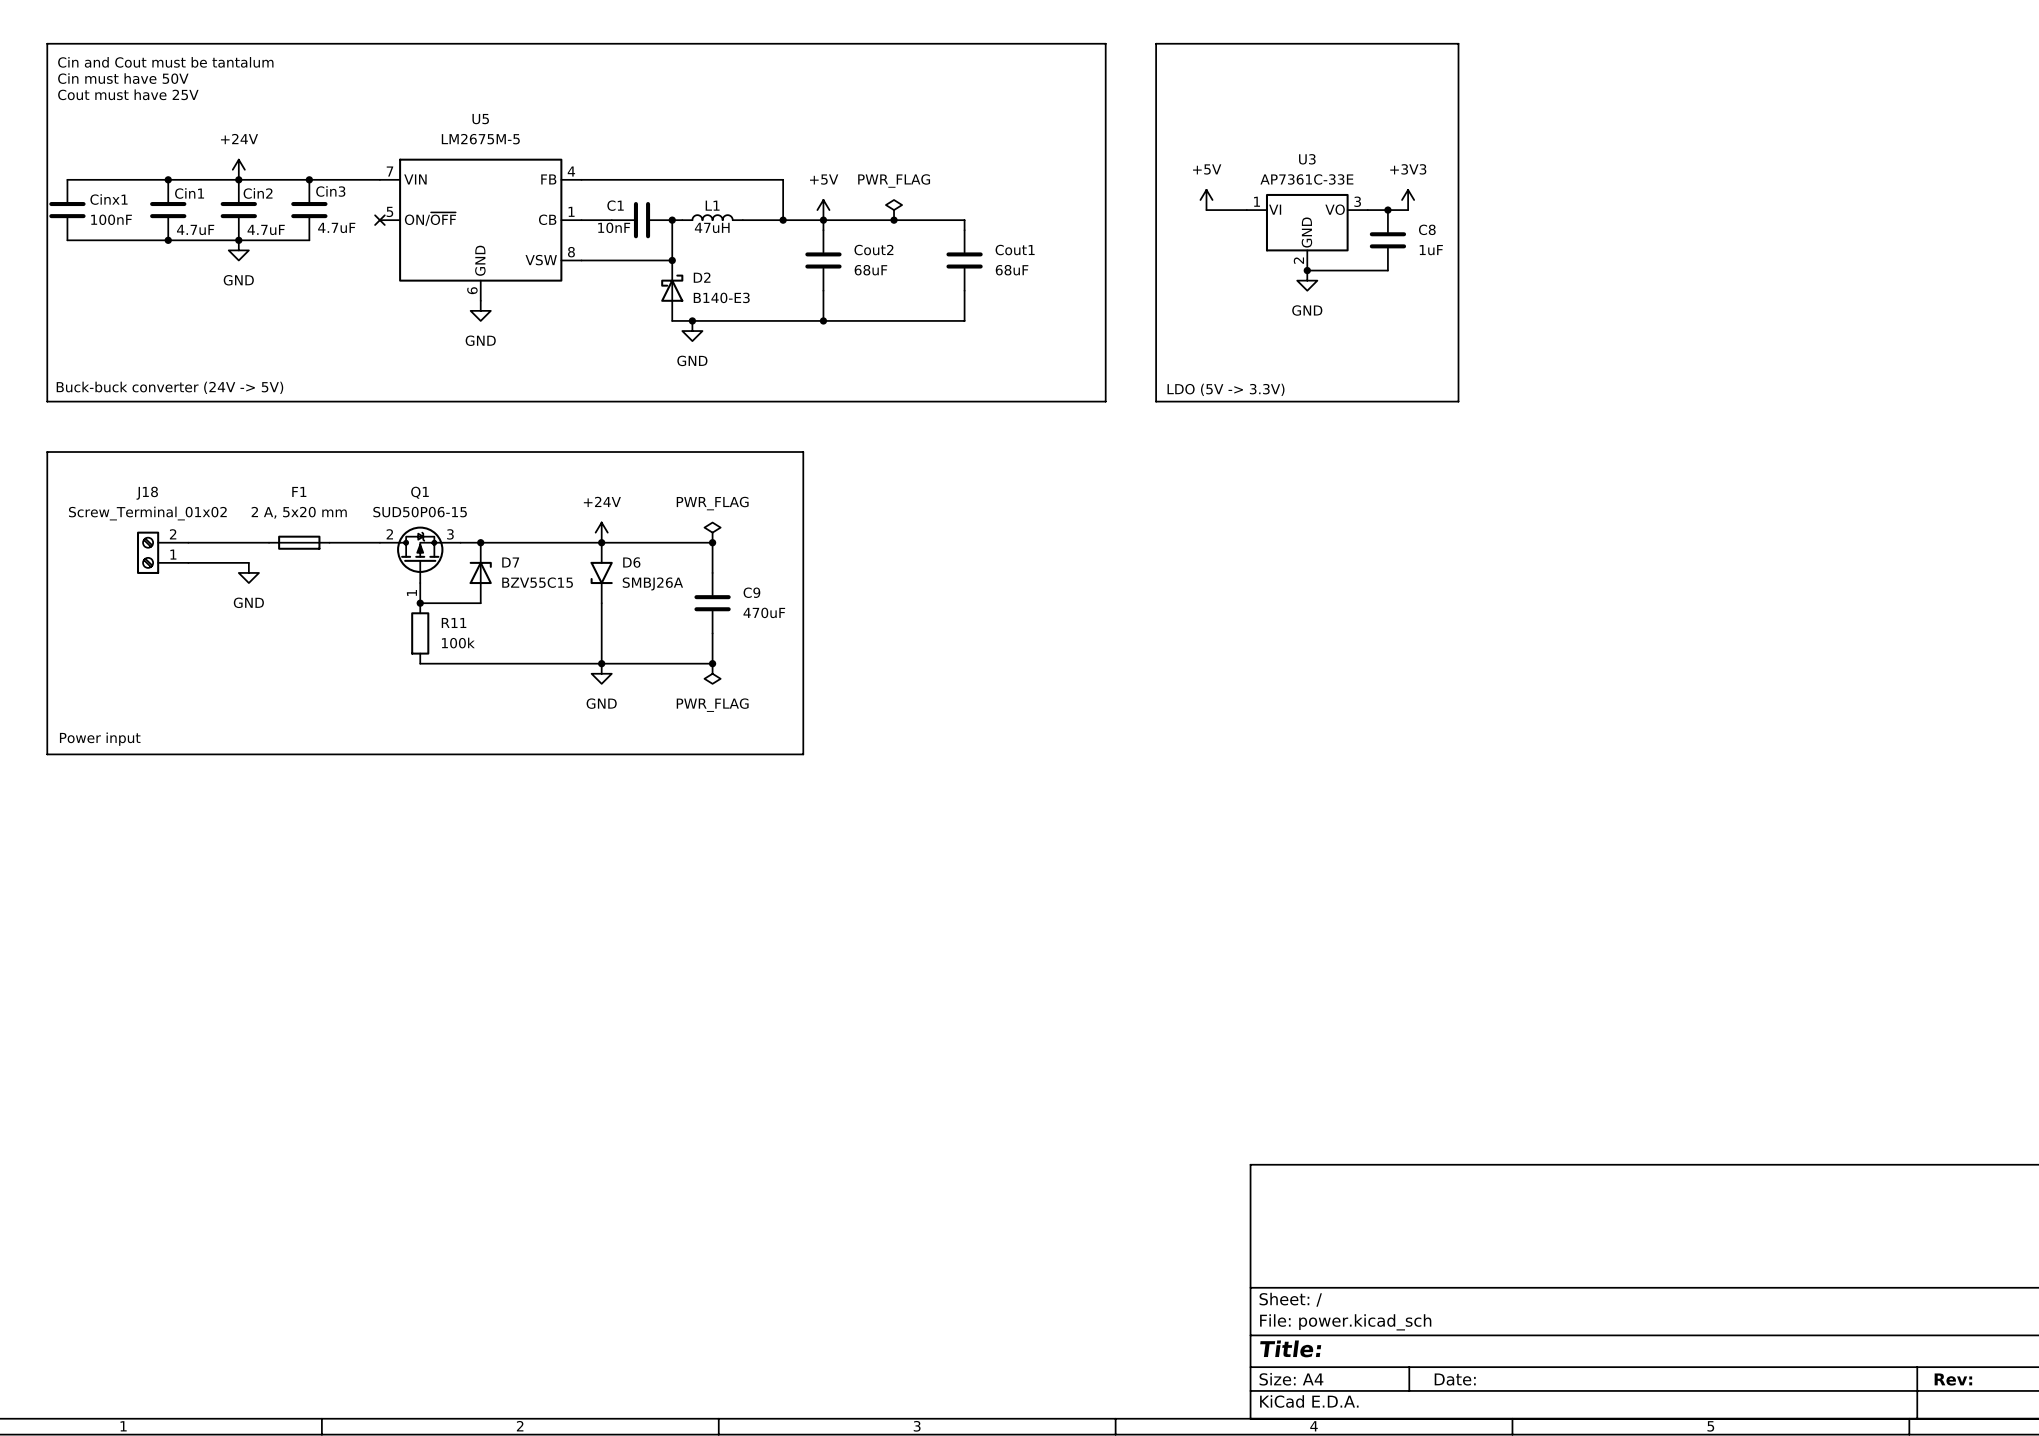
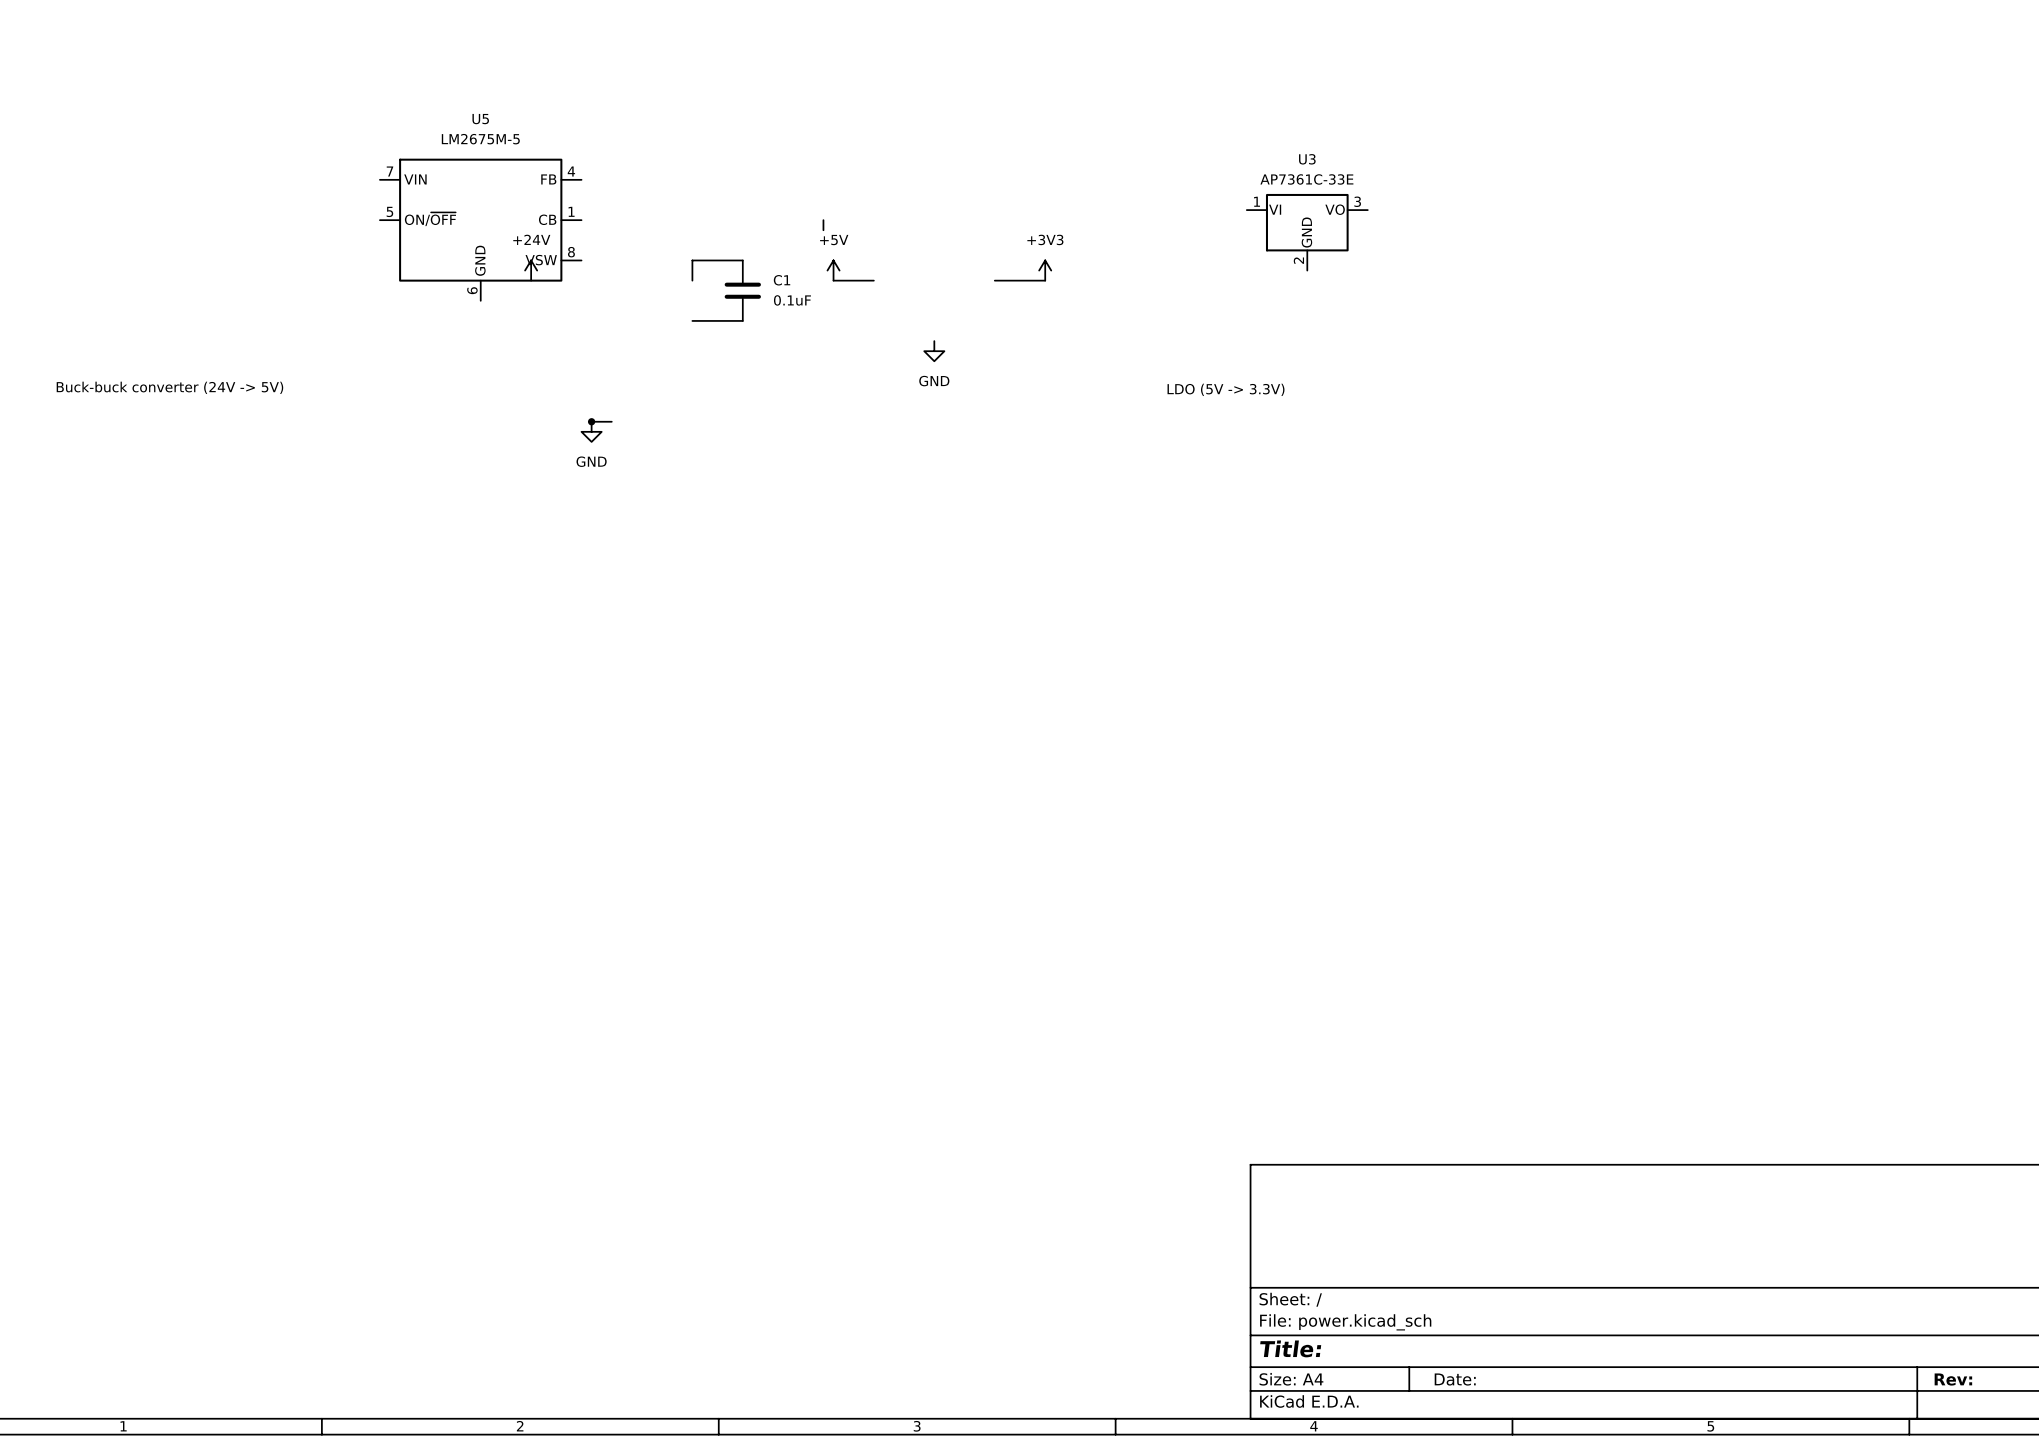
line: (47, 43) (47, 401) (1105, 401) (1105, 43) (47, 43) -> none
line: (1156, 43) (1458, 43) (1458, 401) (1156, 401) (1156, 43) -> none
text: Cin and Cout must be tantalum (165, 62) -> none
text: Cin must have 50V (123, 78) -> none
text: Cout must have 25V (128, 94) -> none
power symbol: +24V (238, 169) -> none
wire: (67, 179) (379, 179) -> none
junction: (168, 179) -> none
junction: (238, 179) -> none
junction: (309, 179) -> none
wire: (581, 179) (783, 179) (783, 220) -> none
power symbol: +5V (1206, 199) -> none
power symbol: +3V3 (1408, 199) -> none
C1 name position: C1 (615, 205) -> C1 (782, 280)
Cinx1: 100nF (67, 210) -> none
Cin1: 4.7uF (168, 210) -> none
Cin2: 4.7uF (238, 210) -> none
Cin3: 4.7uF (309, 210) -> none
power symbol position: +5V (823, 210) -> +5V (833, 270)
power symbol: PWR_FLAG (894, 210) -> none
wire: (1206, 210) (1246, 210) -> none
wire: (1367, 210) (1408, 210) -> none
junction: (1387, 210) -> none
L1: 47uH (712, 217) -> none
no-connect mark: (379, 220) -> none
wire: (581, 220) (611, 220) -> none
C1 rotation: 0° (642, 220) -> 90° clockwise (742, 290)
C1 position: (642, 220) -> (742, 290)
junction: (672, 220) -> none
wire: (682, 220) (672, 220) (672, 260) (581, 260) -> none
wire: (742, 220) (964, 220) (964, 230) -> none
junction: (783, 220) -> none
junction: (823, 220) -> none
junction: (894, 220) -> none
C1 value: 10nF (614, 227) -> 0.1uF (792, 300)
wire: (67, 240) (309, 240) -> none
junction: (168, 240) -> none
junction: (238, 240) -> none
C8: 1uF (1387, 240) -> none
power symbol: GND (238, 250) -> none
junction: (672, 260) -> none
wire: none -> (742, 260) (692, 260) (692, 280)
Cout2: 68uF (823, 260) -> none
Cout1: 68uF (964, 260) -> none
power symbol: none -> +24V (531, 270)
power symbol: none -> +3V3 (1045, 270)
wire: (1307, 270) (1387, 270) -> none
junction: (1307, 270) -> none
wire: none -> (833, 280) (873, 280)
wire: none -> (994, 280) (1045, 280)
power symbol: GND (1307, 280) -> none
D2: B140-E3 (672, 290) -> none
wire: (823, 290) (823, 320) -> none
wire: (964, 290) (964, 320) (742, 320) -> none
power symbol: GND (480, 310) -> none
wire: (672, 320) (692, 320) -> (591, 421) (611, 421)
junction: (692, 320) -> none
junction: (823, 320) -> none
power symbol: GND (692, 331) -> none
power symbol: none -> GND (934, 351)
junction: none -> (591, 421)
power symbol: none -> GND (591, 431)
line: (47, 452) (803, 452) (803, 754) (47, 754) (47, 452) -> none
power symbol: +24V (601, 532) -> none
power symbol: PWR_FLAG (712, 532) -> none
wire: (188, 542) (269, 542) -> none
F1: 2 A, 5x20 mm (299, 542) -> none
wire: (329, 542) (379, 542) -> none
wire: (460, 542) (712, 542) (712, 572) -> none
junction: (480, 542) -> none
junction: (601, 542) -> none
junction: (712, 542) -> none
J18: Screw_Terminal_01x02 (162, 552) -> none
wire: (188, 562) (248, 562) -> none
Q1: SUD50P06-15 (420, 564) -> none
power symbol: GND (248, 572) -> none
D7: BZV55C15 (480, 572) -> none
D6: SMBJ26A (601, 572) -> none
wire: (420, 603) (480, 603) -> none
junction: (420, 603) -> none
wire: (601, 603) (601, 663) -> none
C9: 470uF (712, 603) -> none
R11: 100k (420, 633) -> none
wire: (712, 633) (712, 663) (420, 663) -> none
junction: (601, 663) -> none
junction: (712, 663) -> none
power symbol: GND (601, 673) -> none
power symbol: PWR_FLAG (712, 673) -> none
text: Power input (100, 739) -> none

